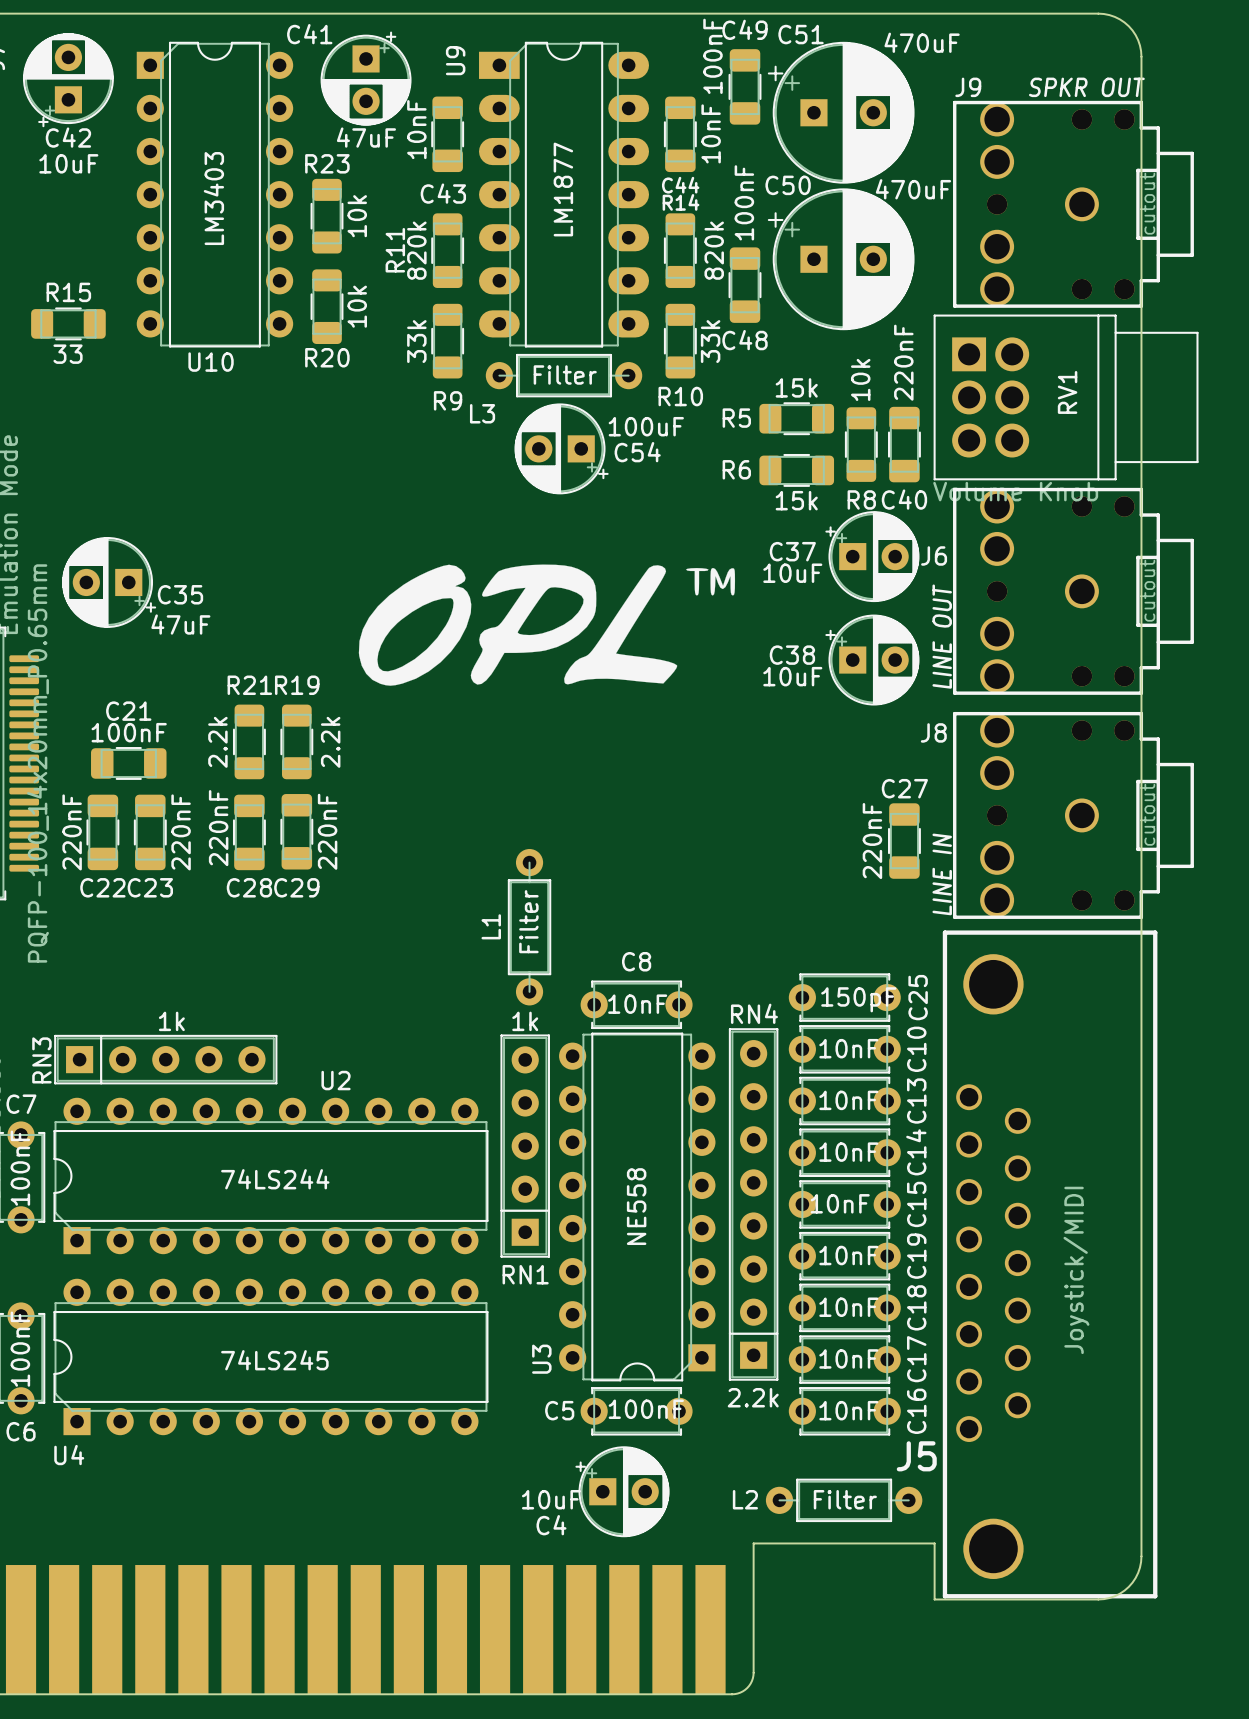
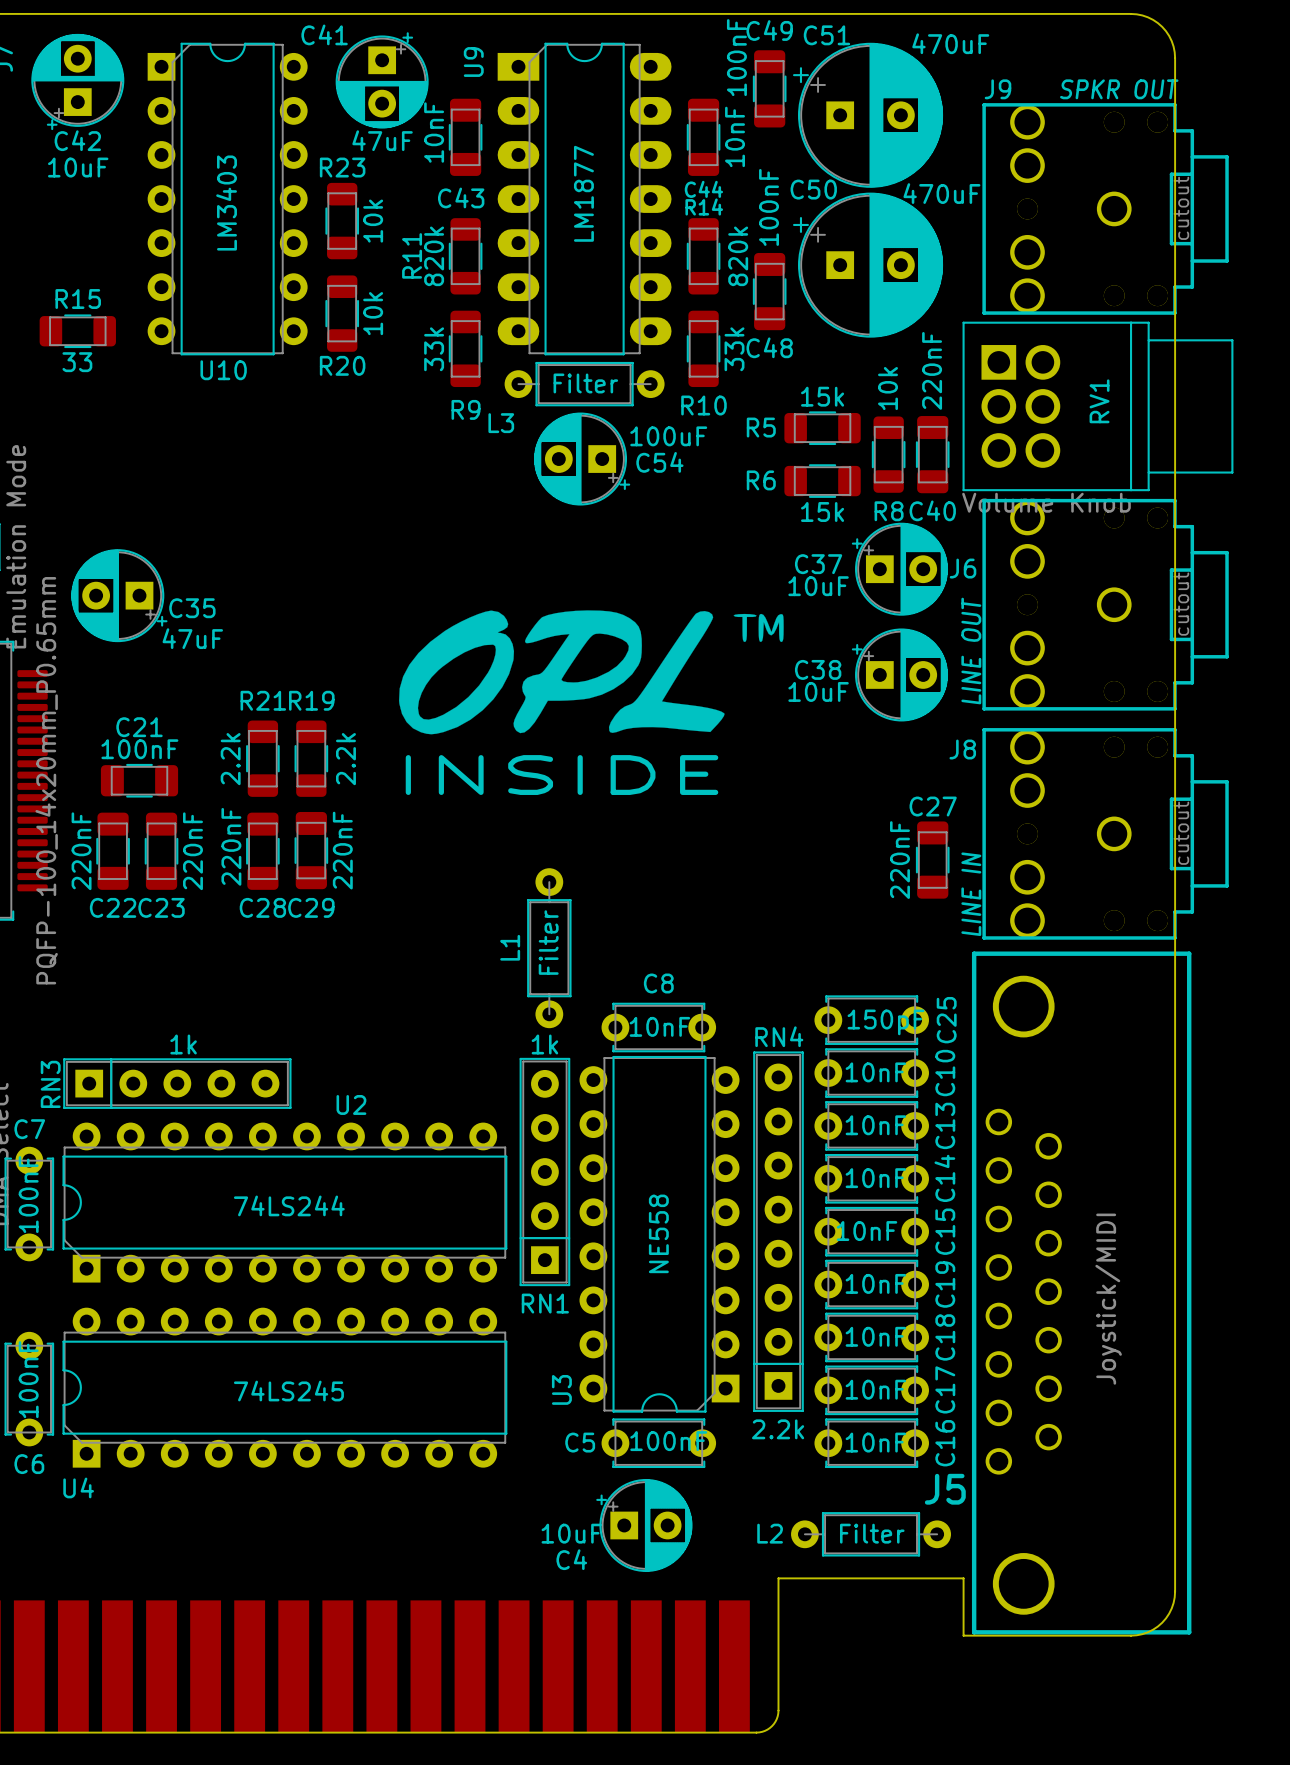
drawing position: (546, 625) -> (591, 672)
text: none -> INSIDE (562, 775)

